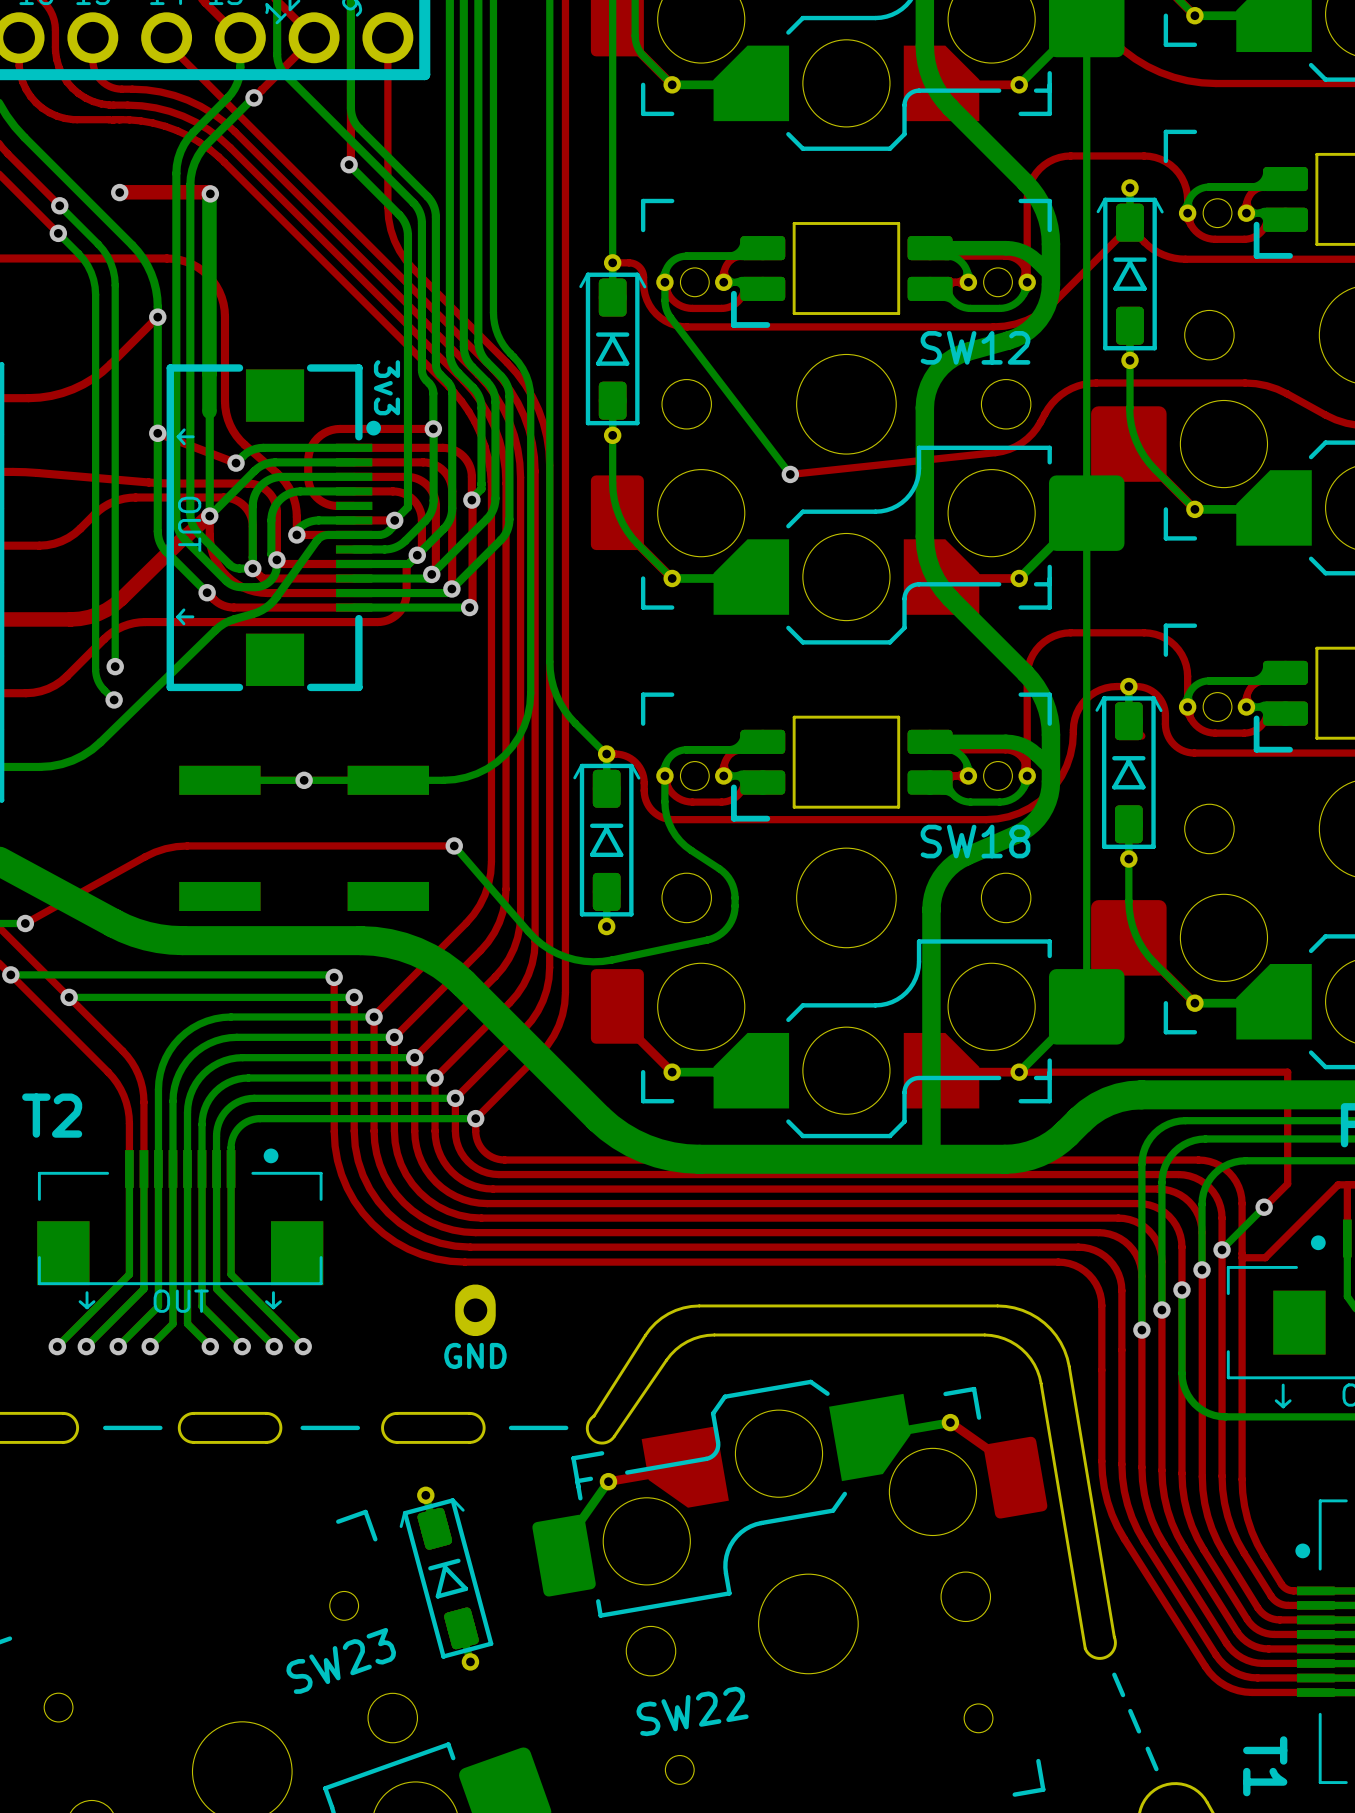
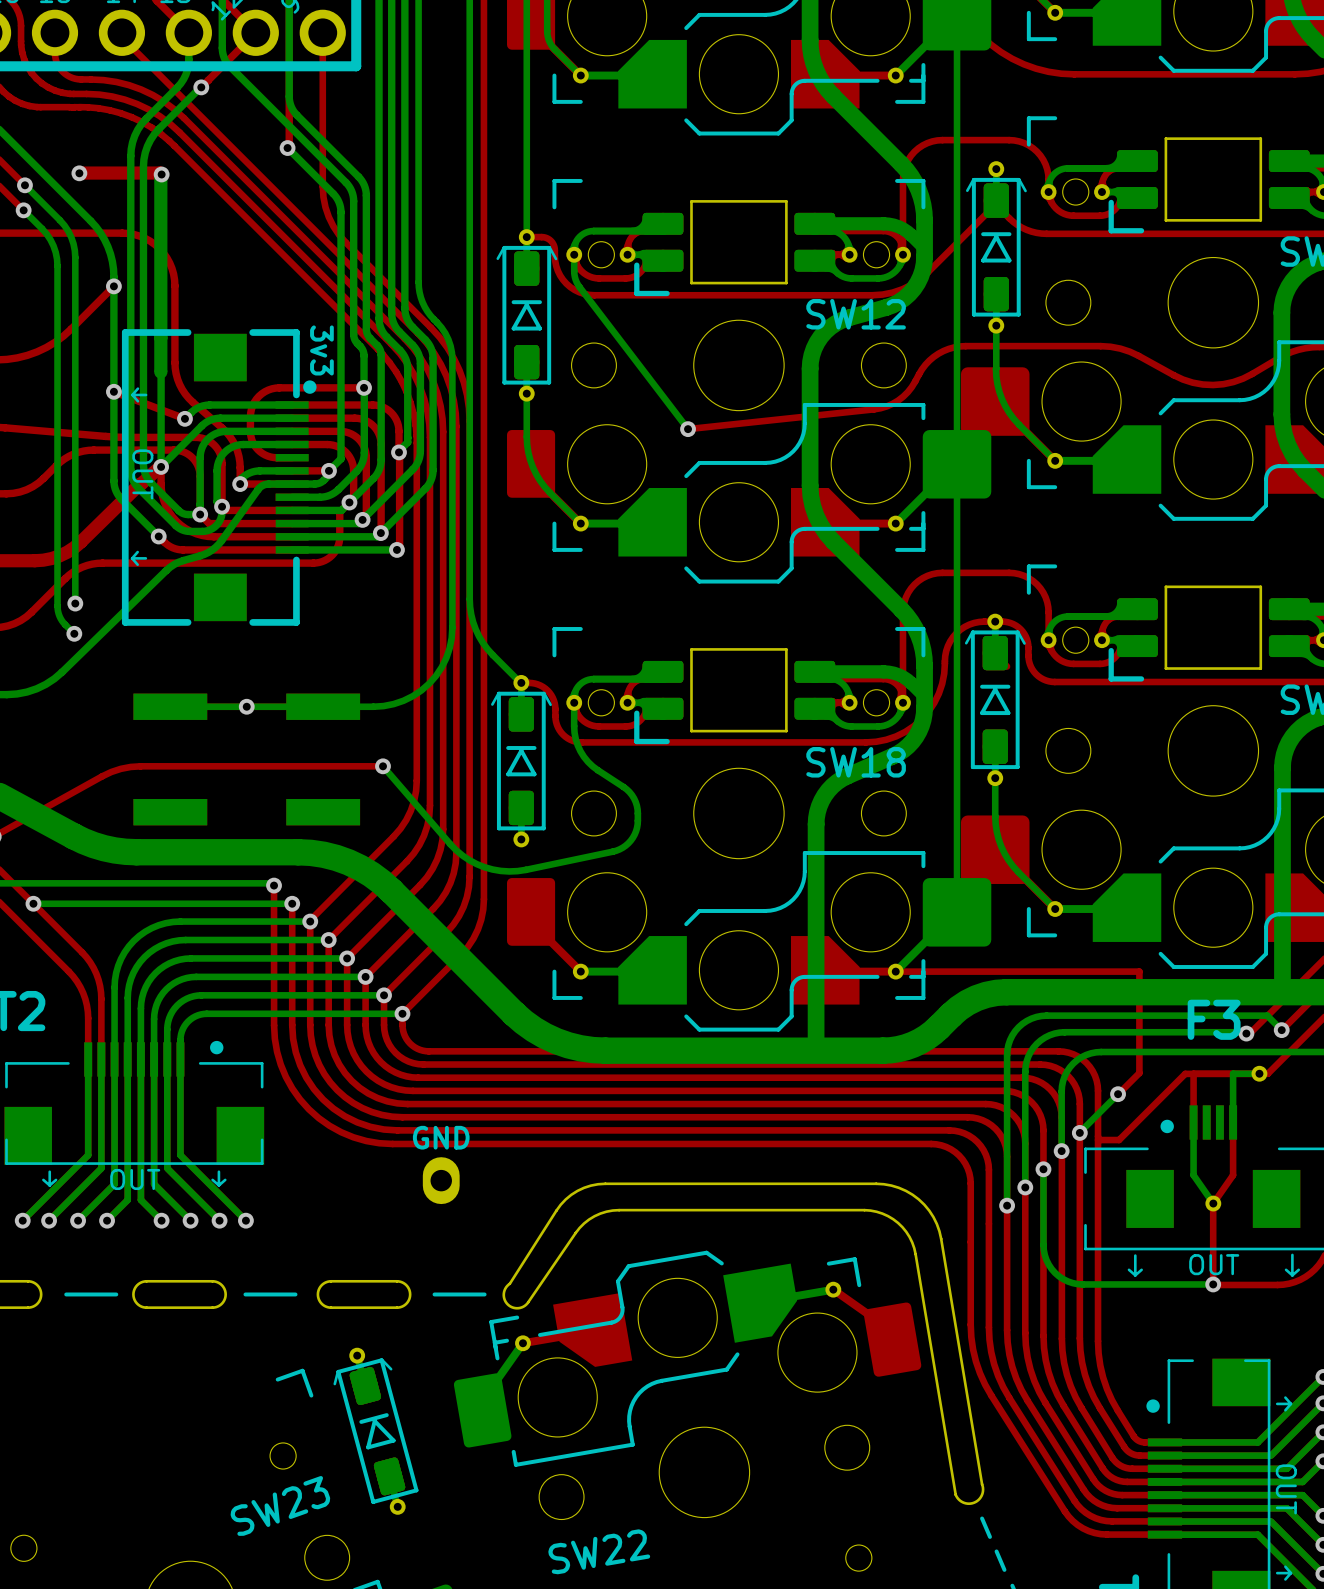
part rotation: 0° (475, 1310) -> 180° (441, 1180)
part position: (475, 1310) -> (441, 1180)

